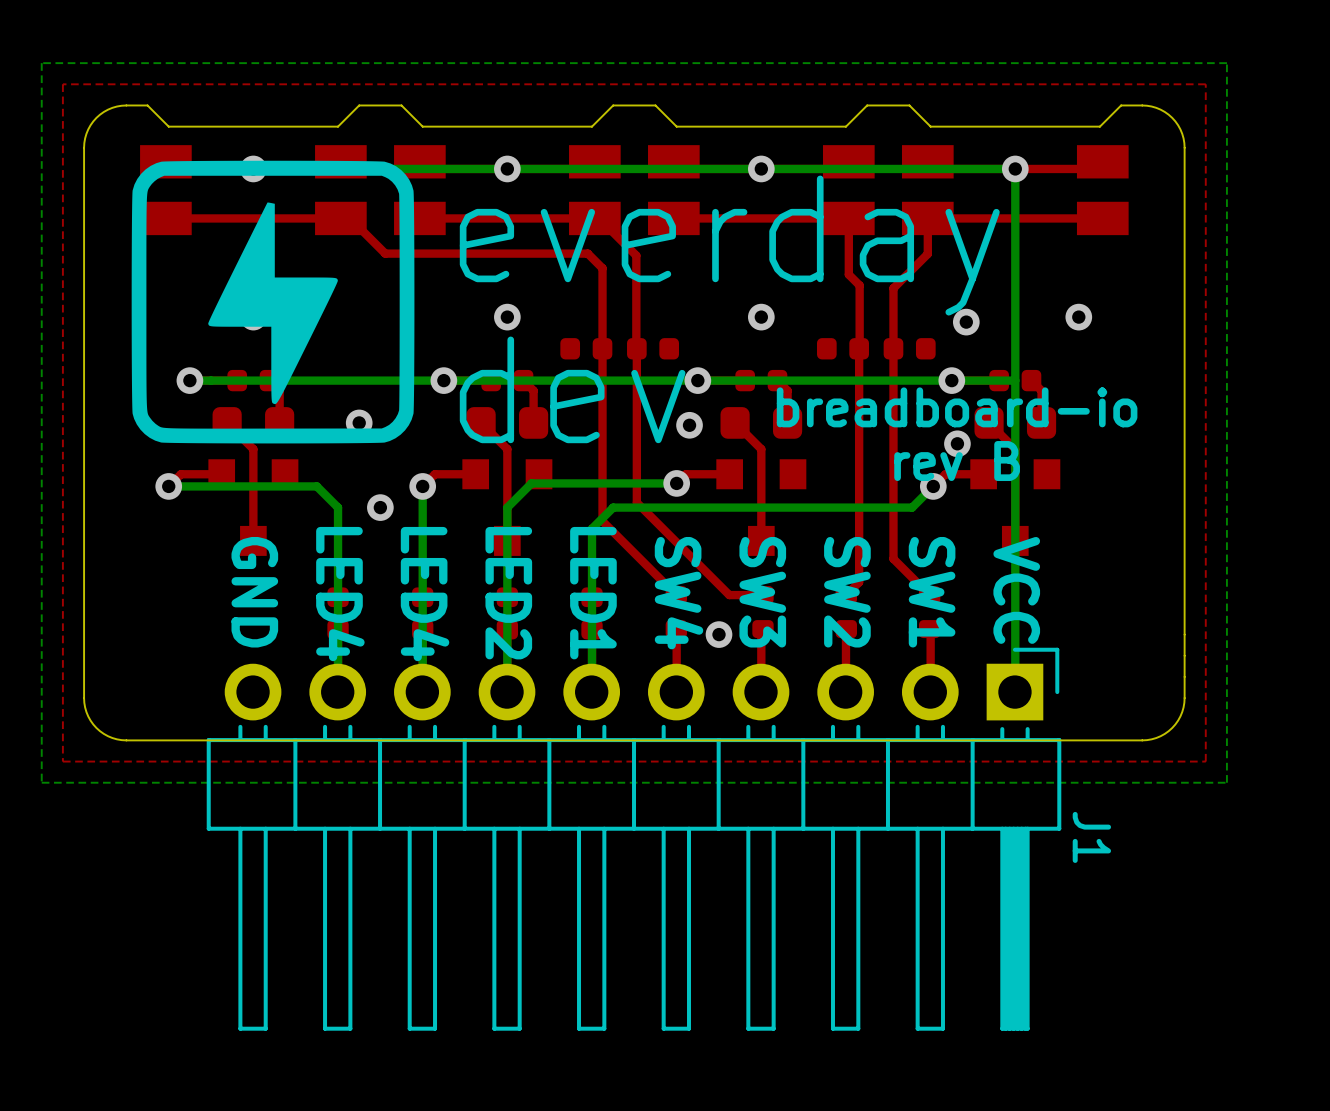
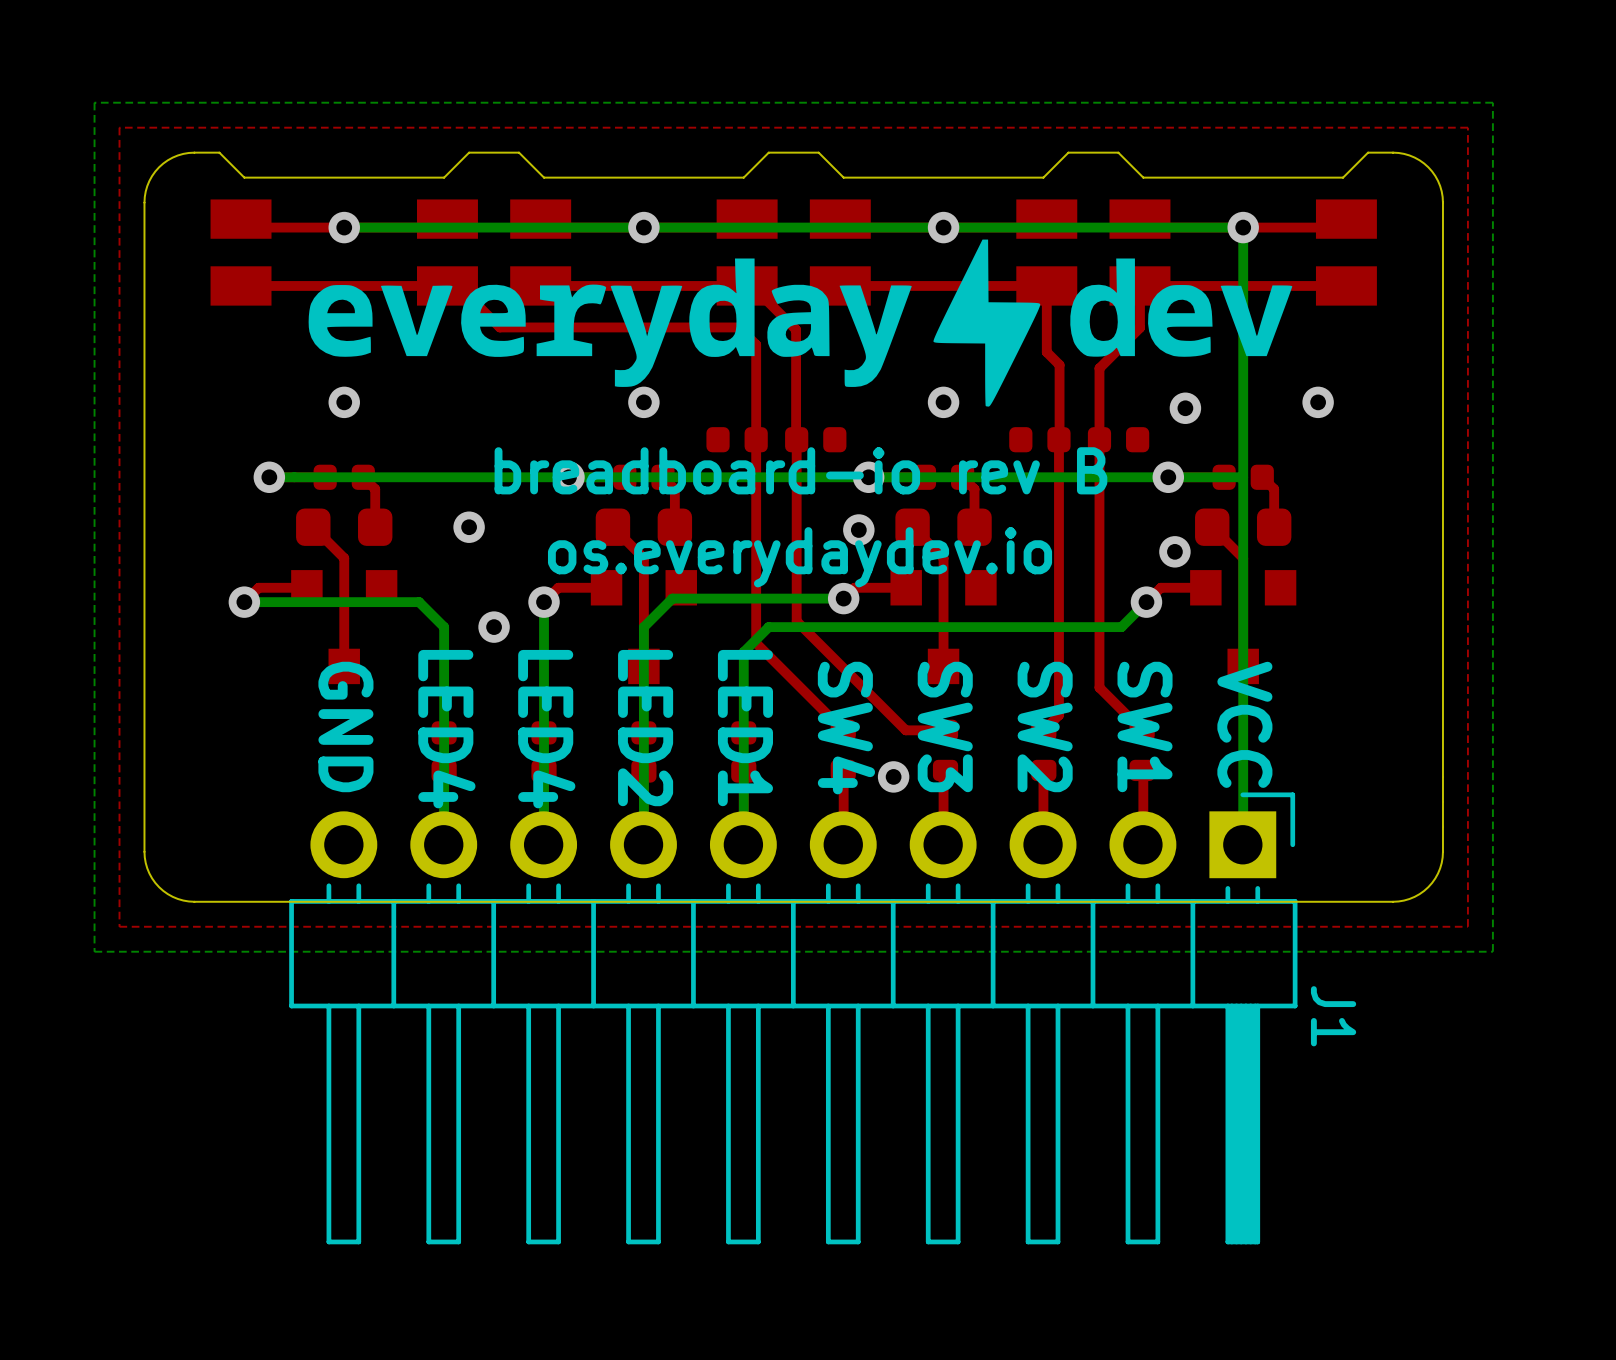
drawing: [131, 160, 415, 444] -> none
drawing: none -> [308, 239, 1293, 407]
text: everday (729, 245) -> none
text: dev (572, 389) -> none
text: breadboard-io (957, 407) -> breadboard-io rev B (800, 470)
text: none -> os.everydaydev.io (800, 557)
text: rev B (957, 461) -> none

